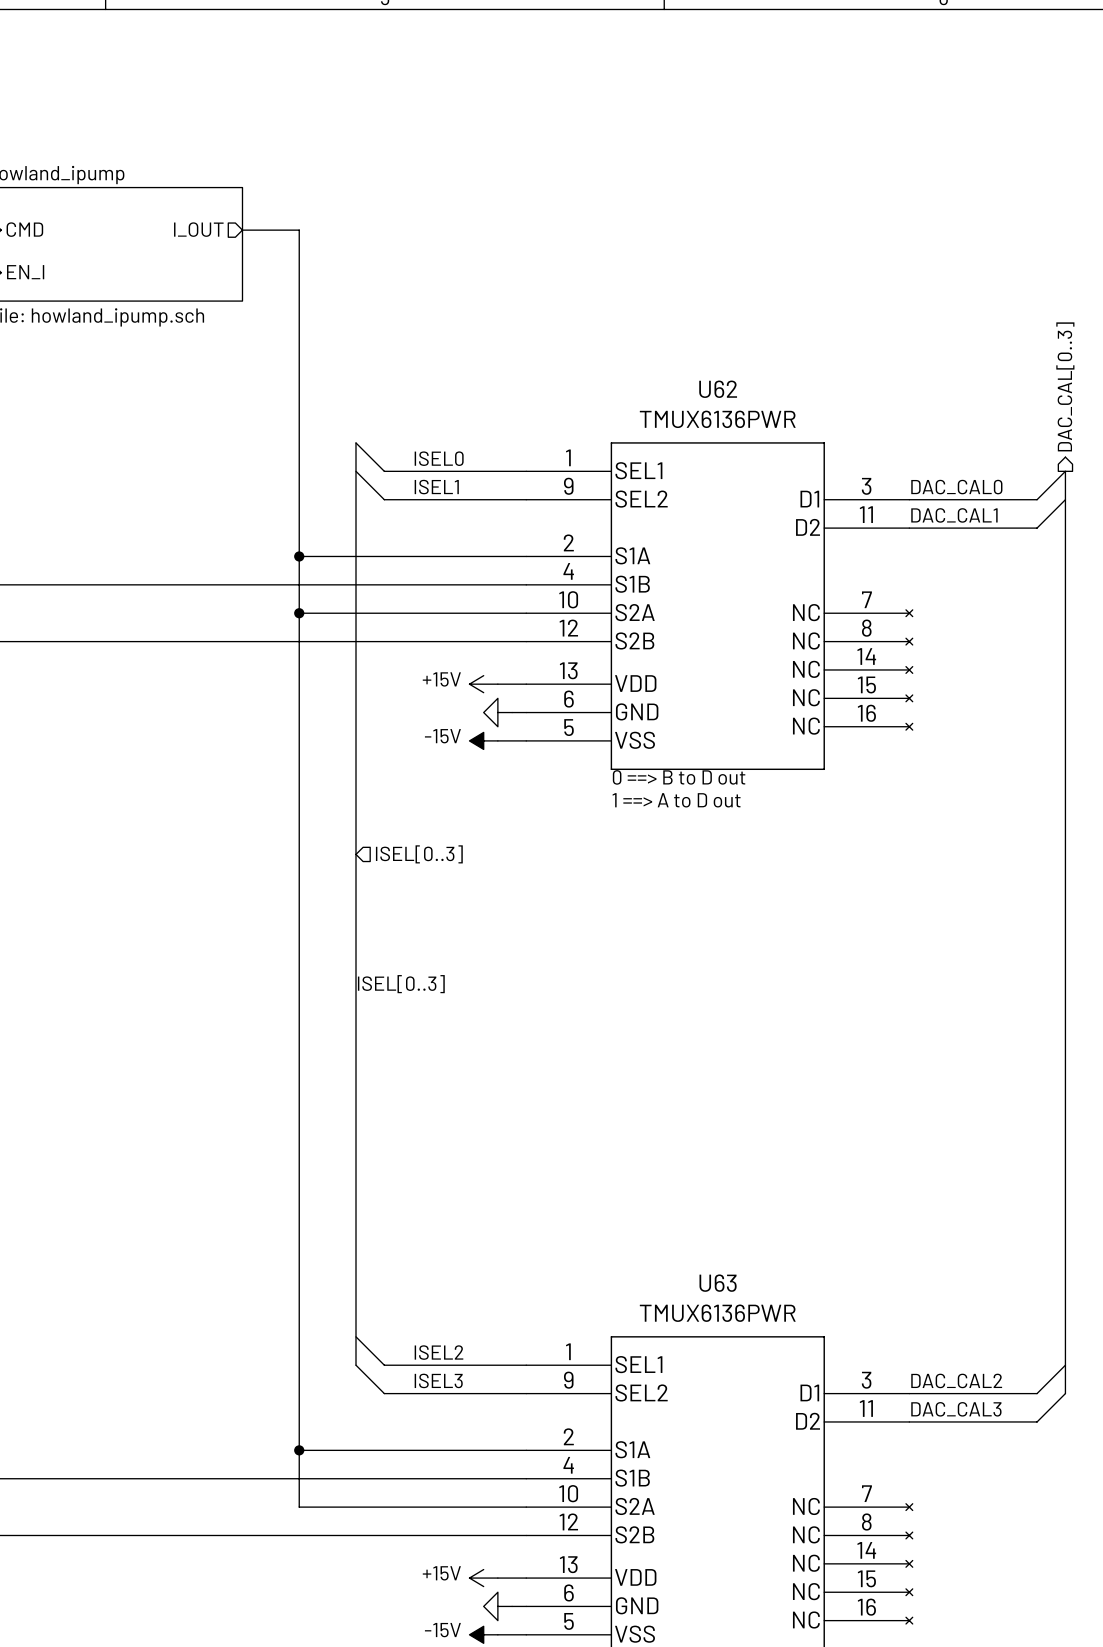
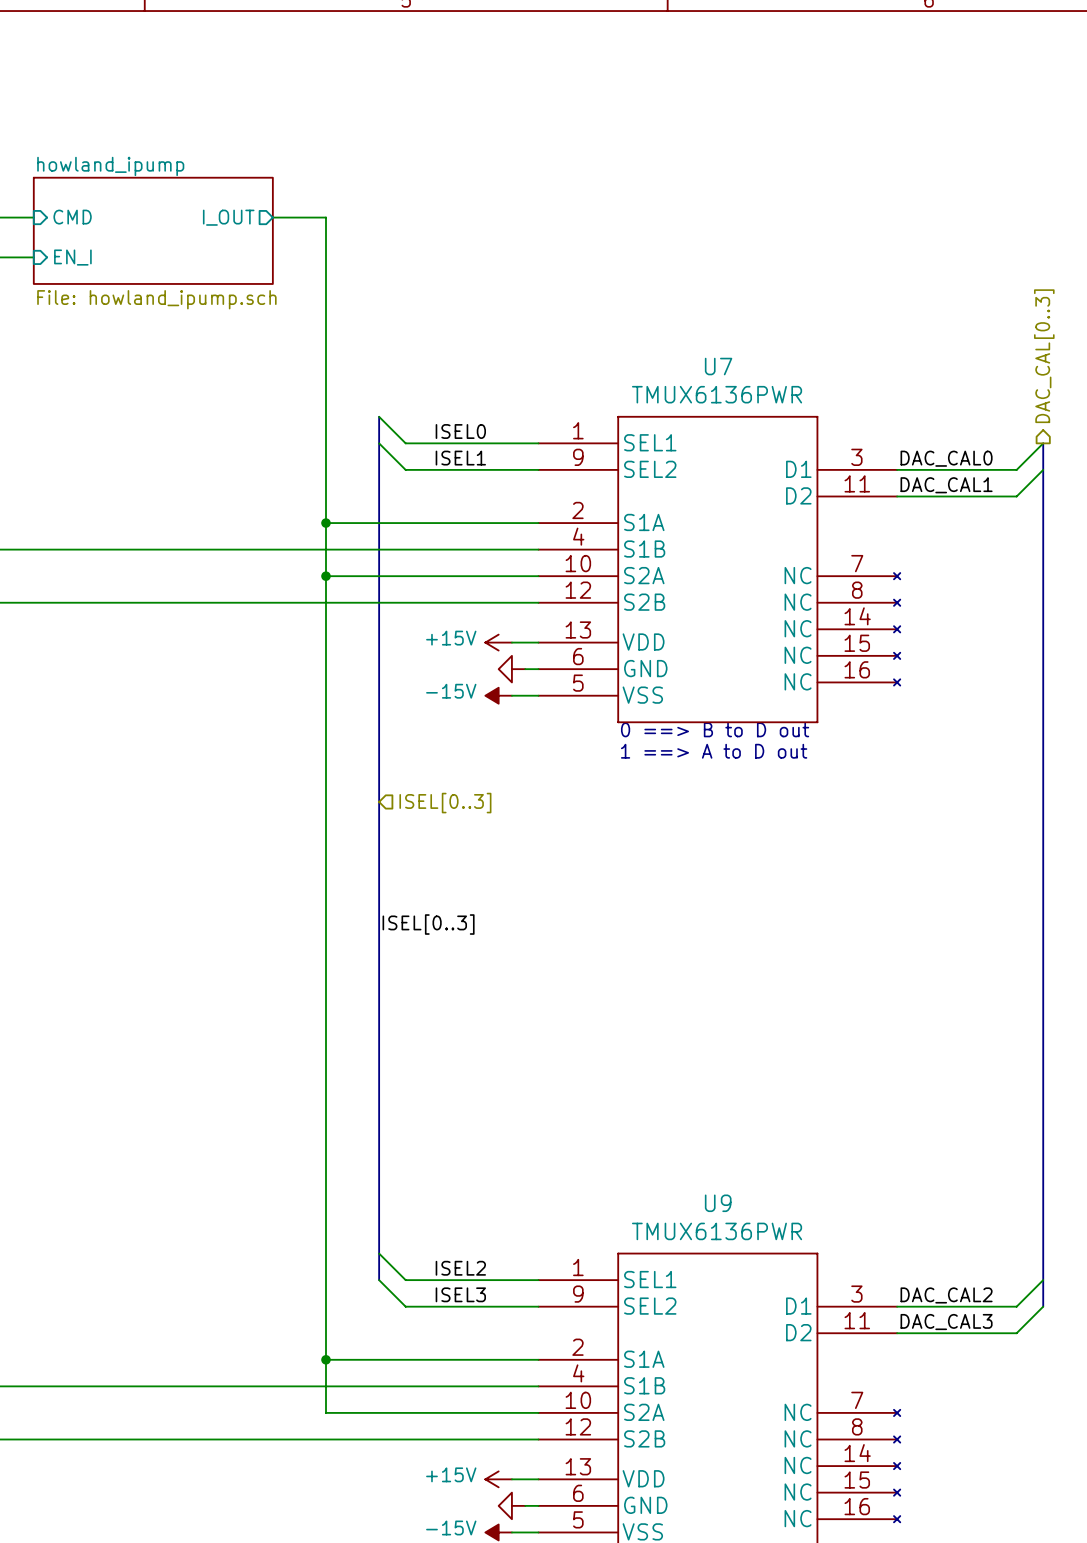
U62 name: U62 (718, 389) -> U7 (718, 366)
U63 name: U63 (718, 1283) -> U9 (718, 1203)

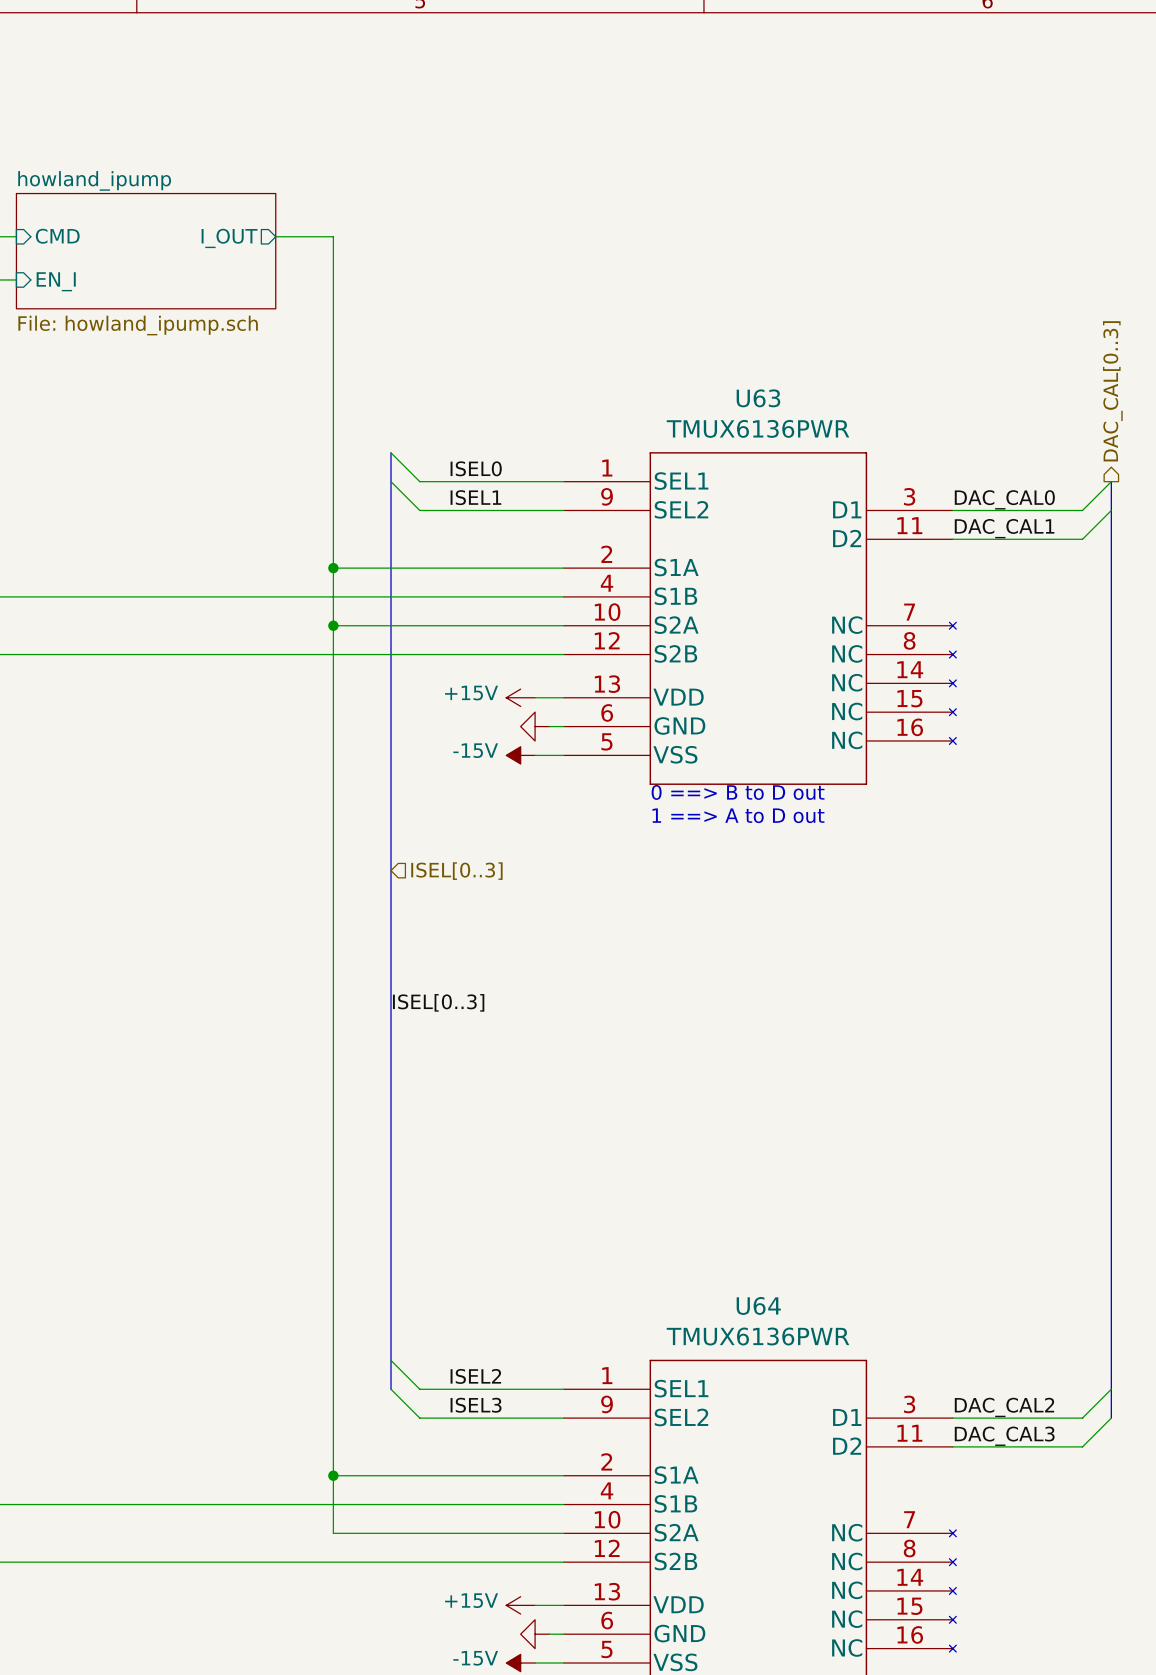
U7 name: U7 (718, 366) -> U63 (758, 398)
U9 name: U9 (718, 1203) -> U64 (758, 1305)

